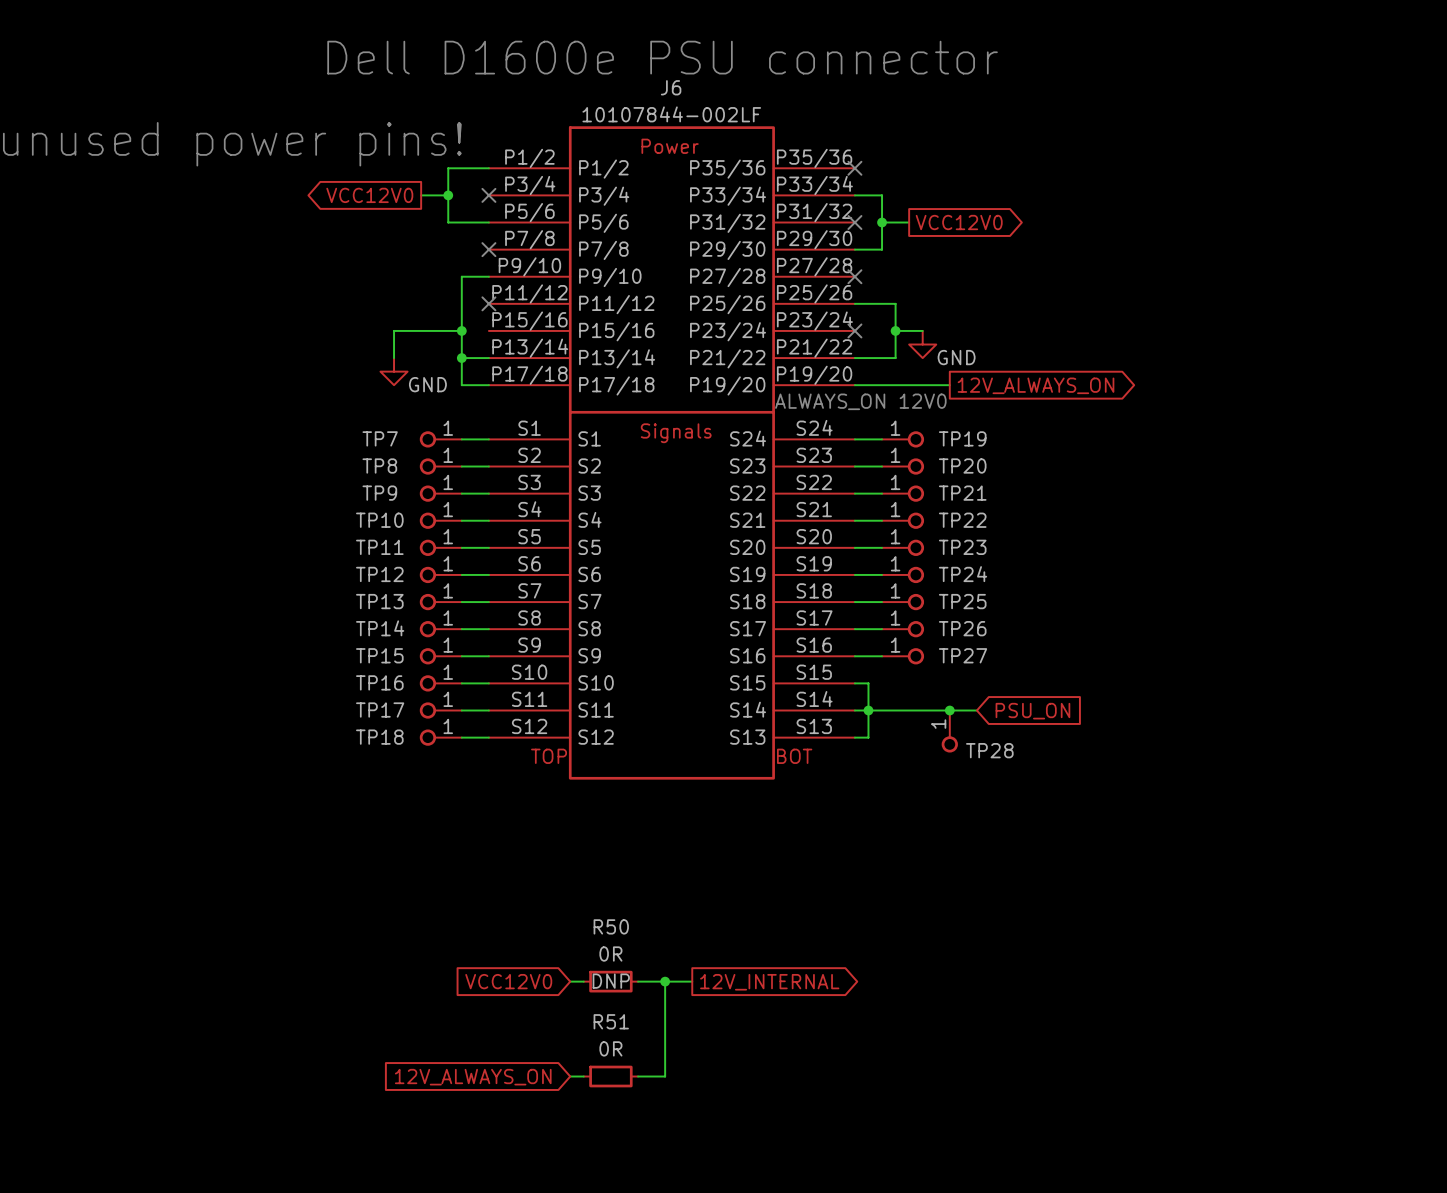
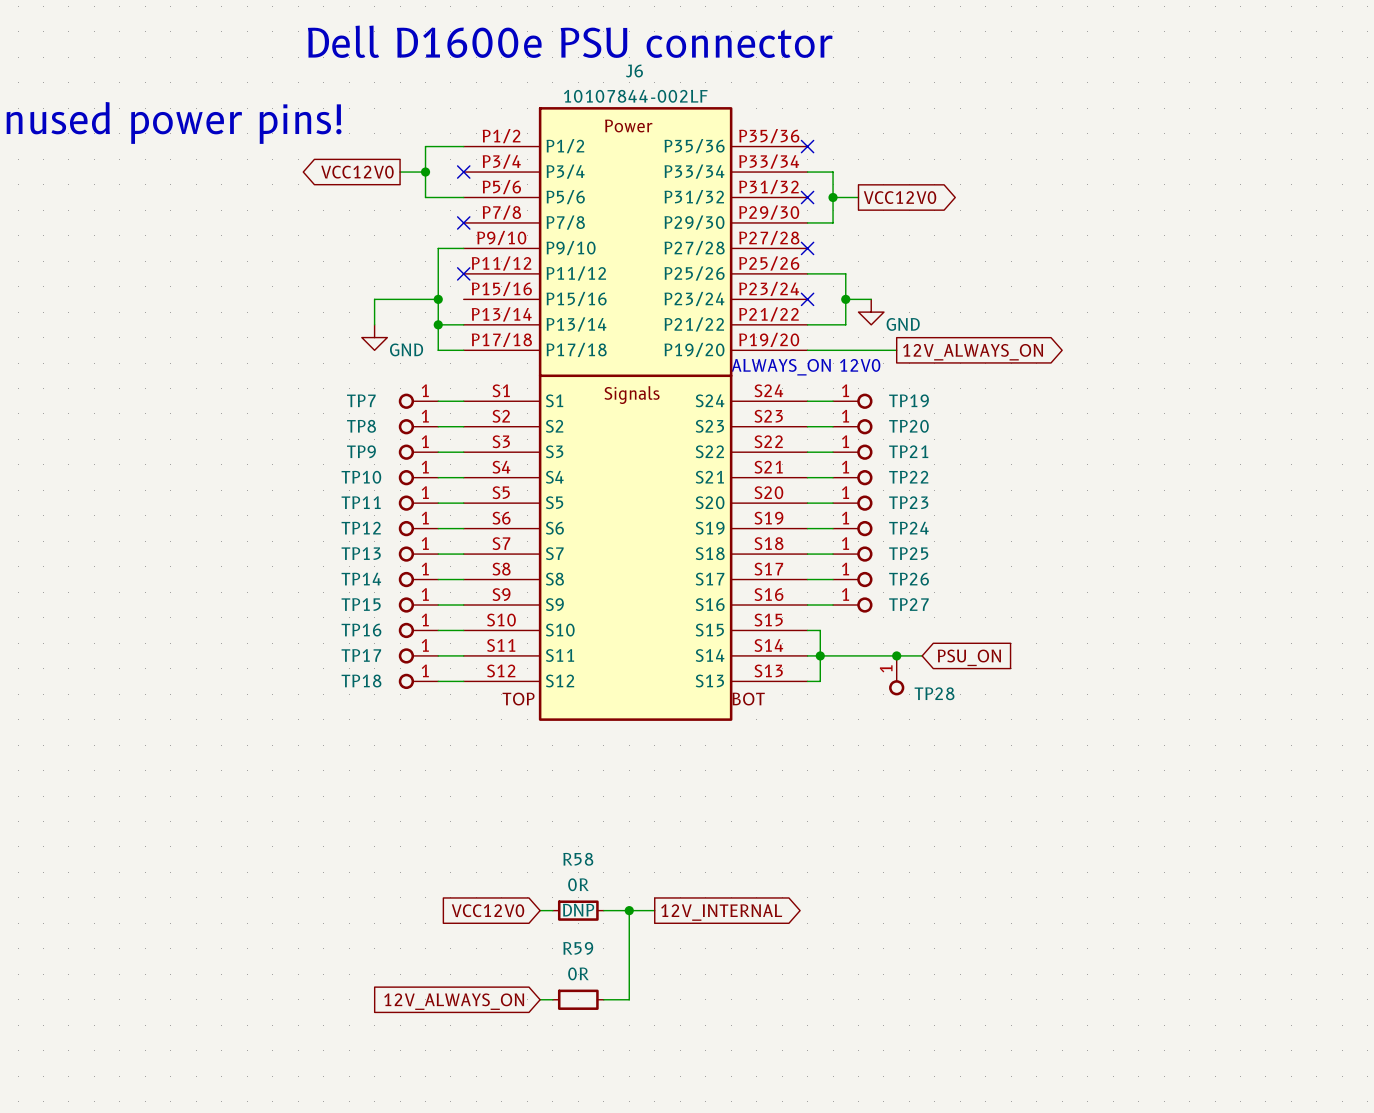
R50 name: R50 (611, 926) -> R58 (578, 859)
R51 name: R51 (611, 1021) -> R59 (578, 948)

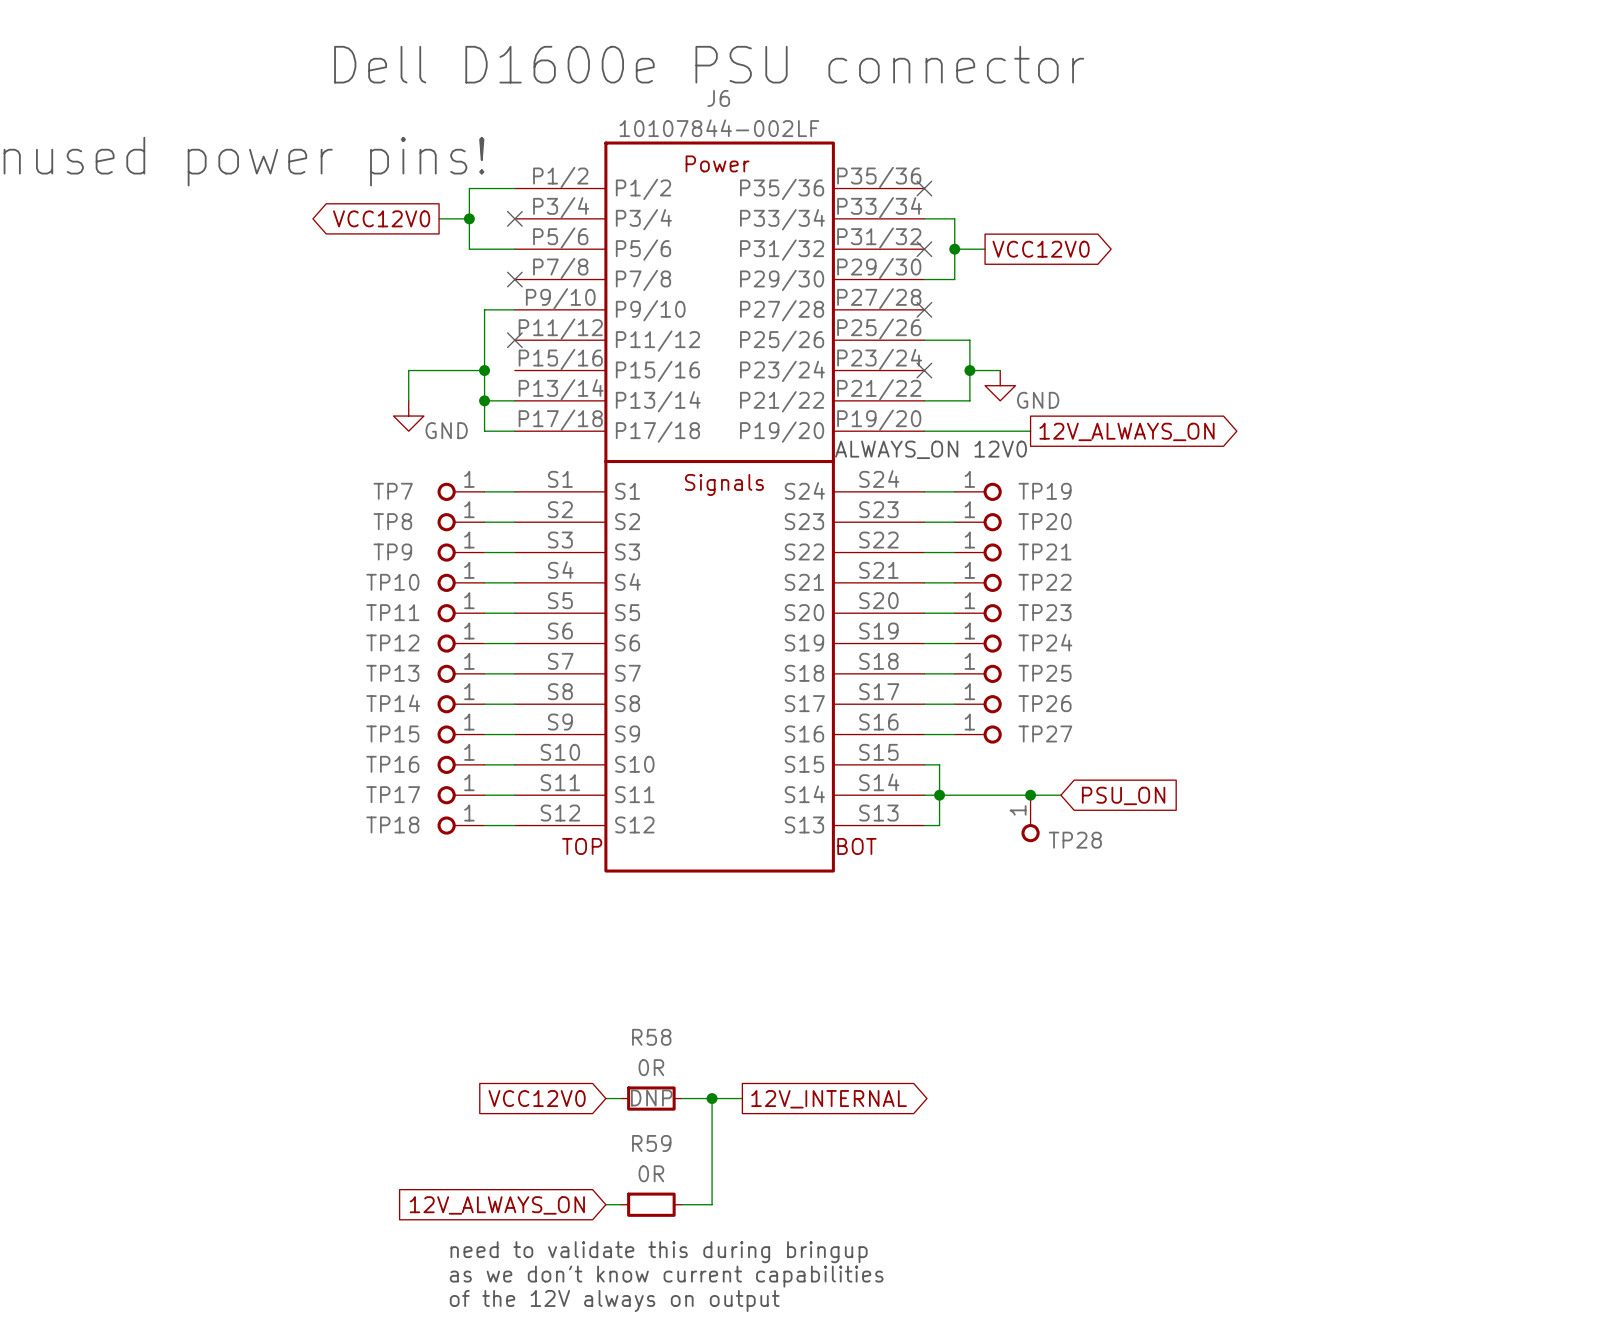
text: none -> need to validate this during bringup (659, 1252)
text: none -> as we don't know current capabilities (666, 1276)
text: none -> of the 12V always on output (614, 1300)

